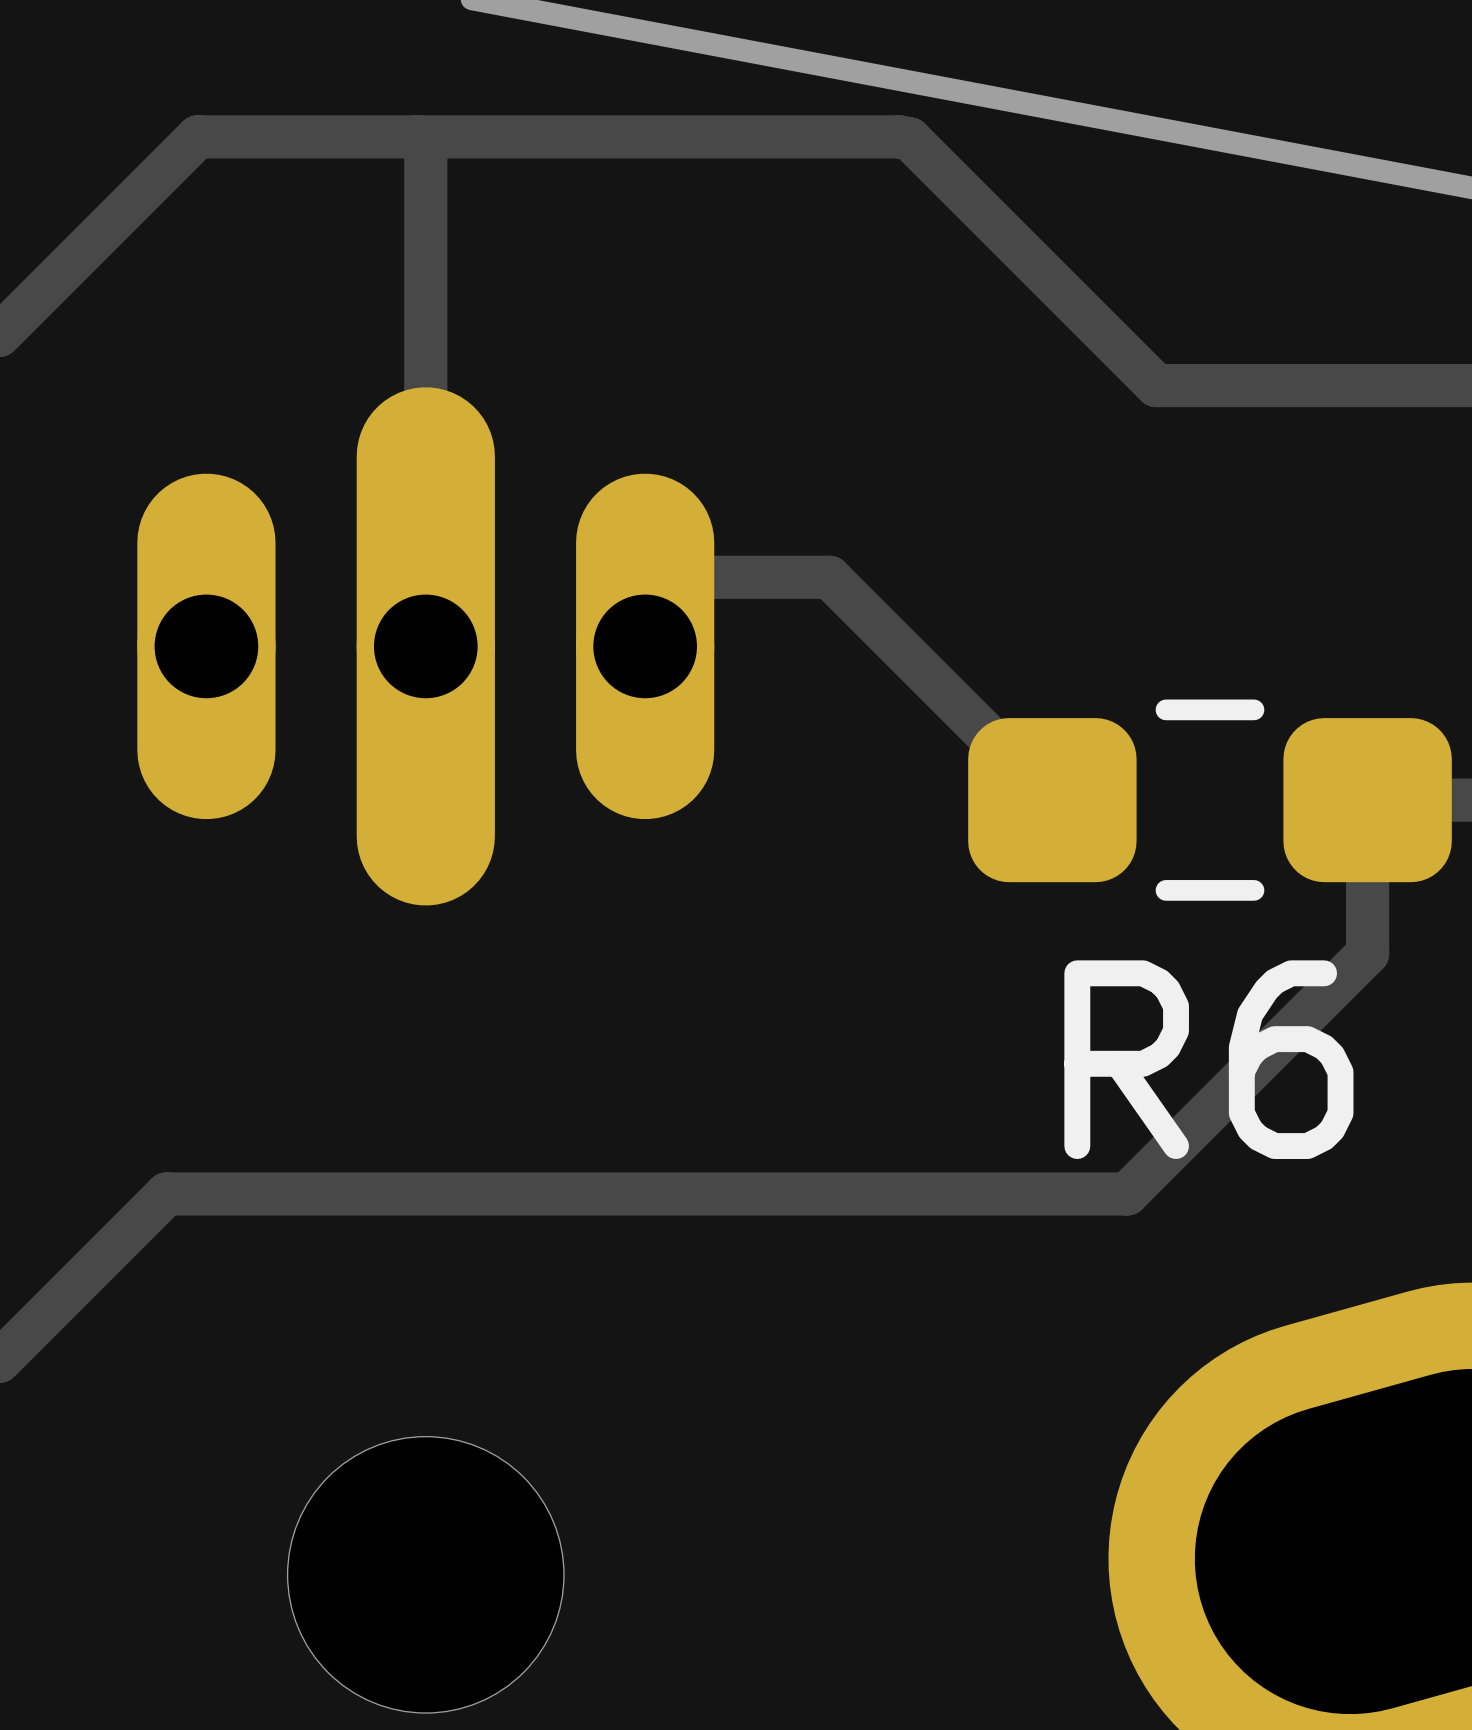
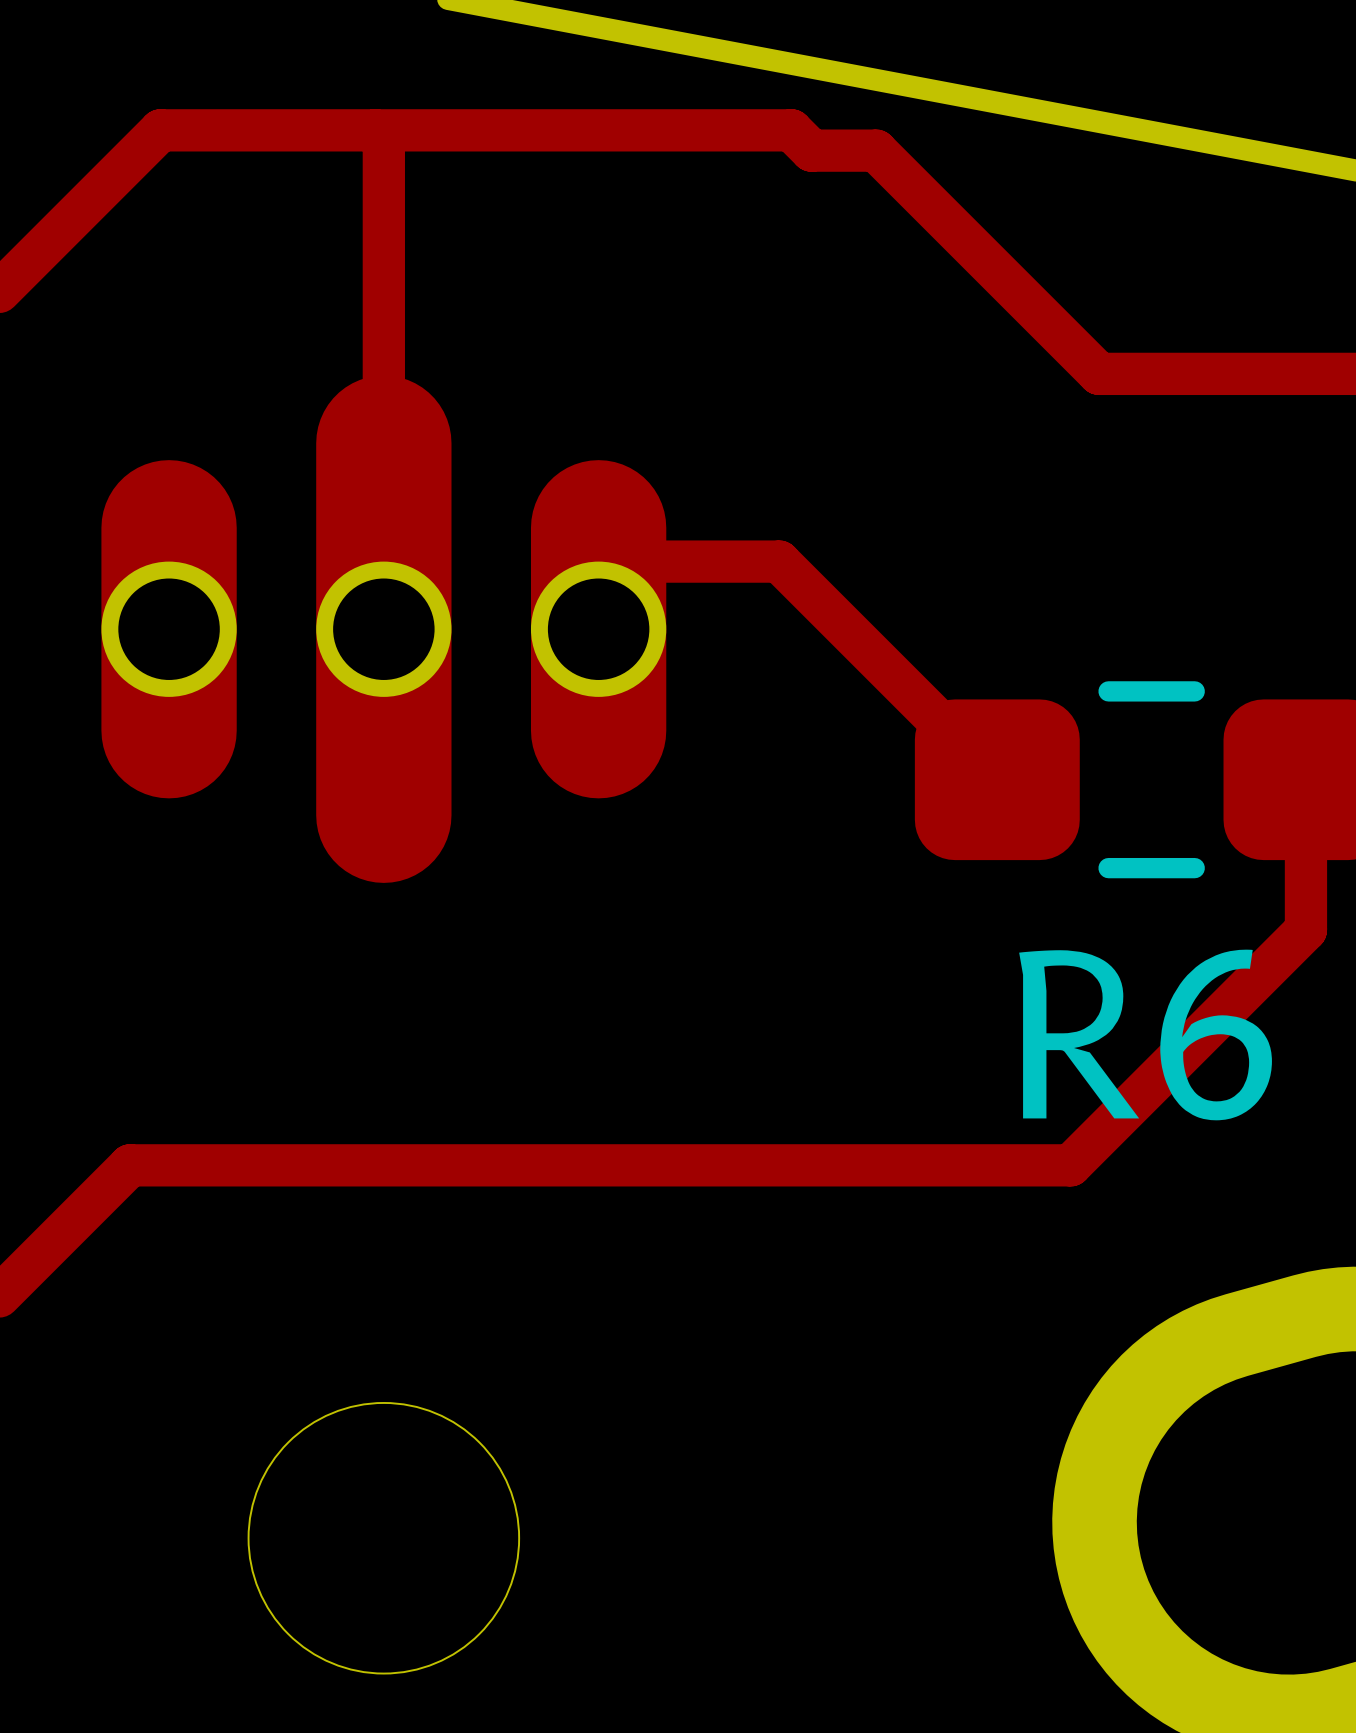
track: (842, 136) (899, 136) (909, 138) (928, 157) -> (791, 130) (811, 150) (875, 150)

